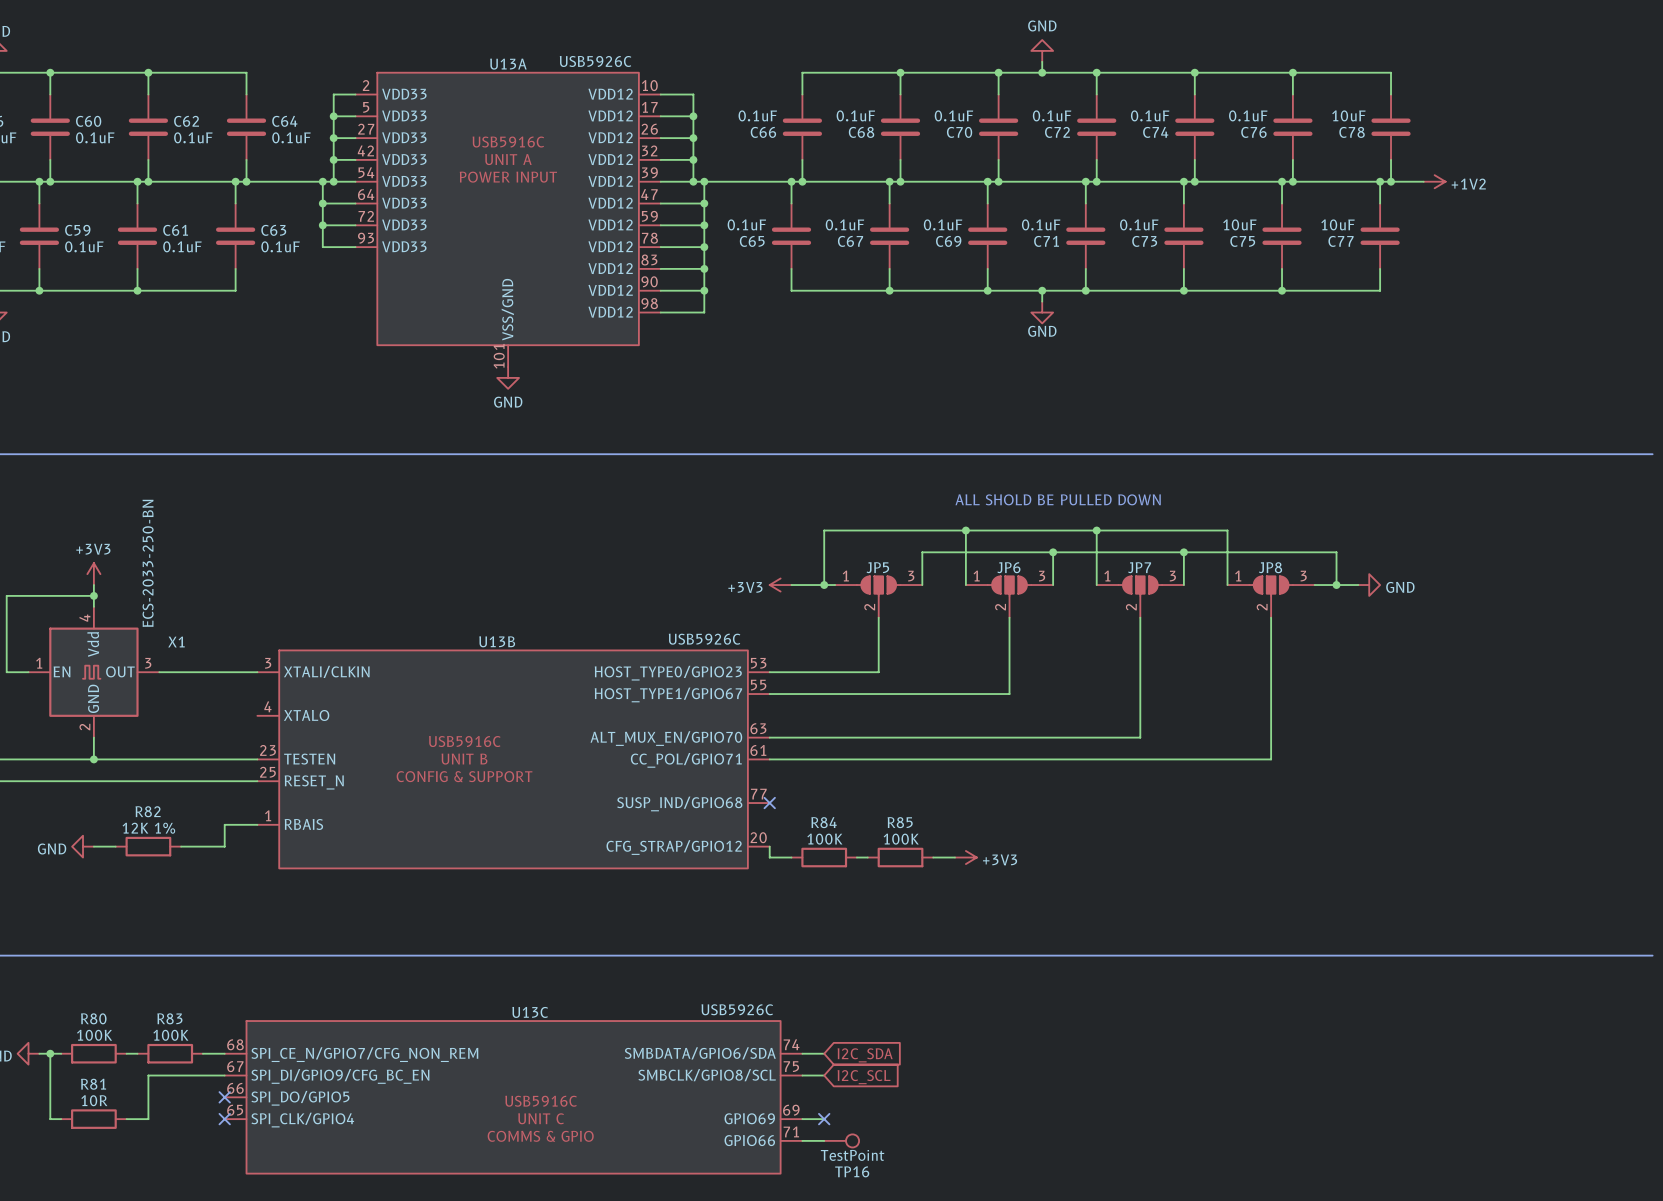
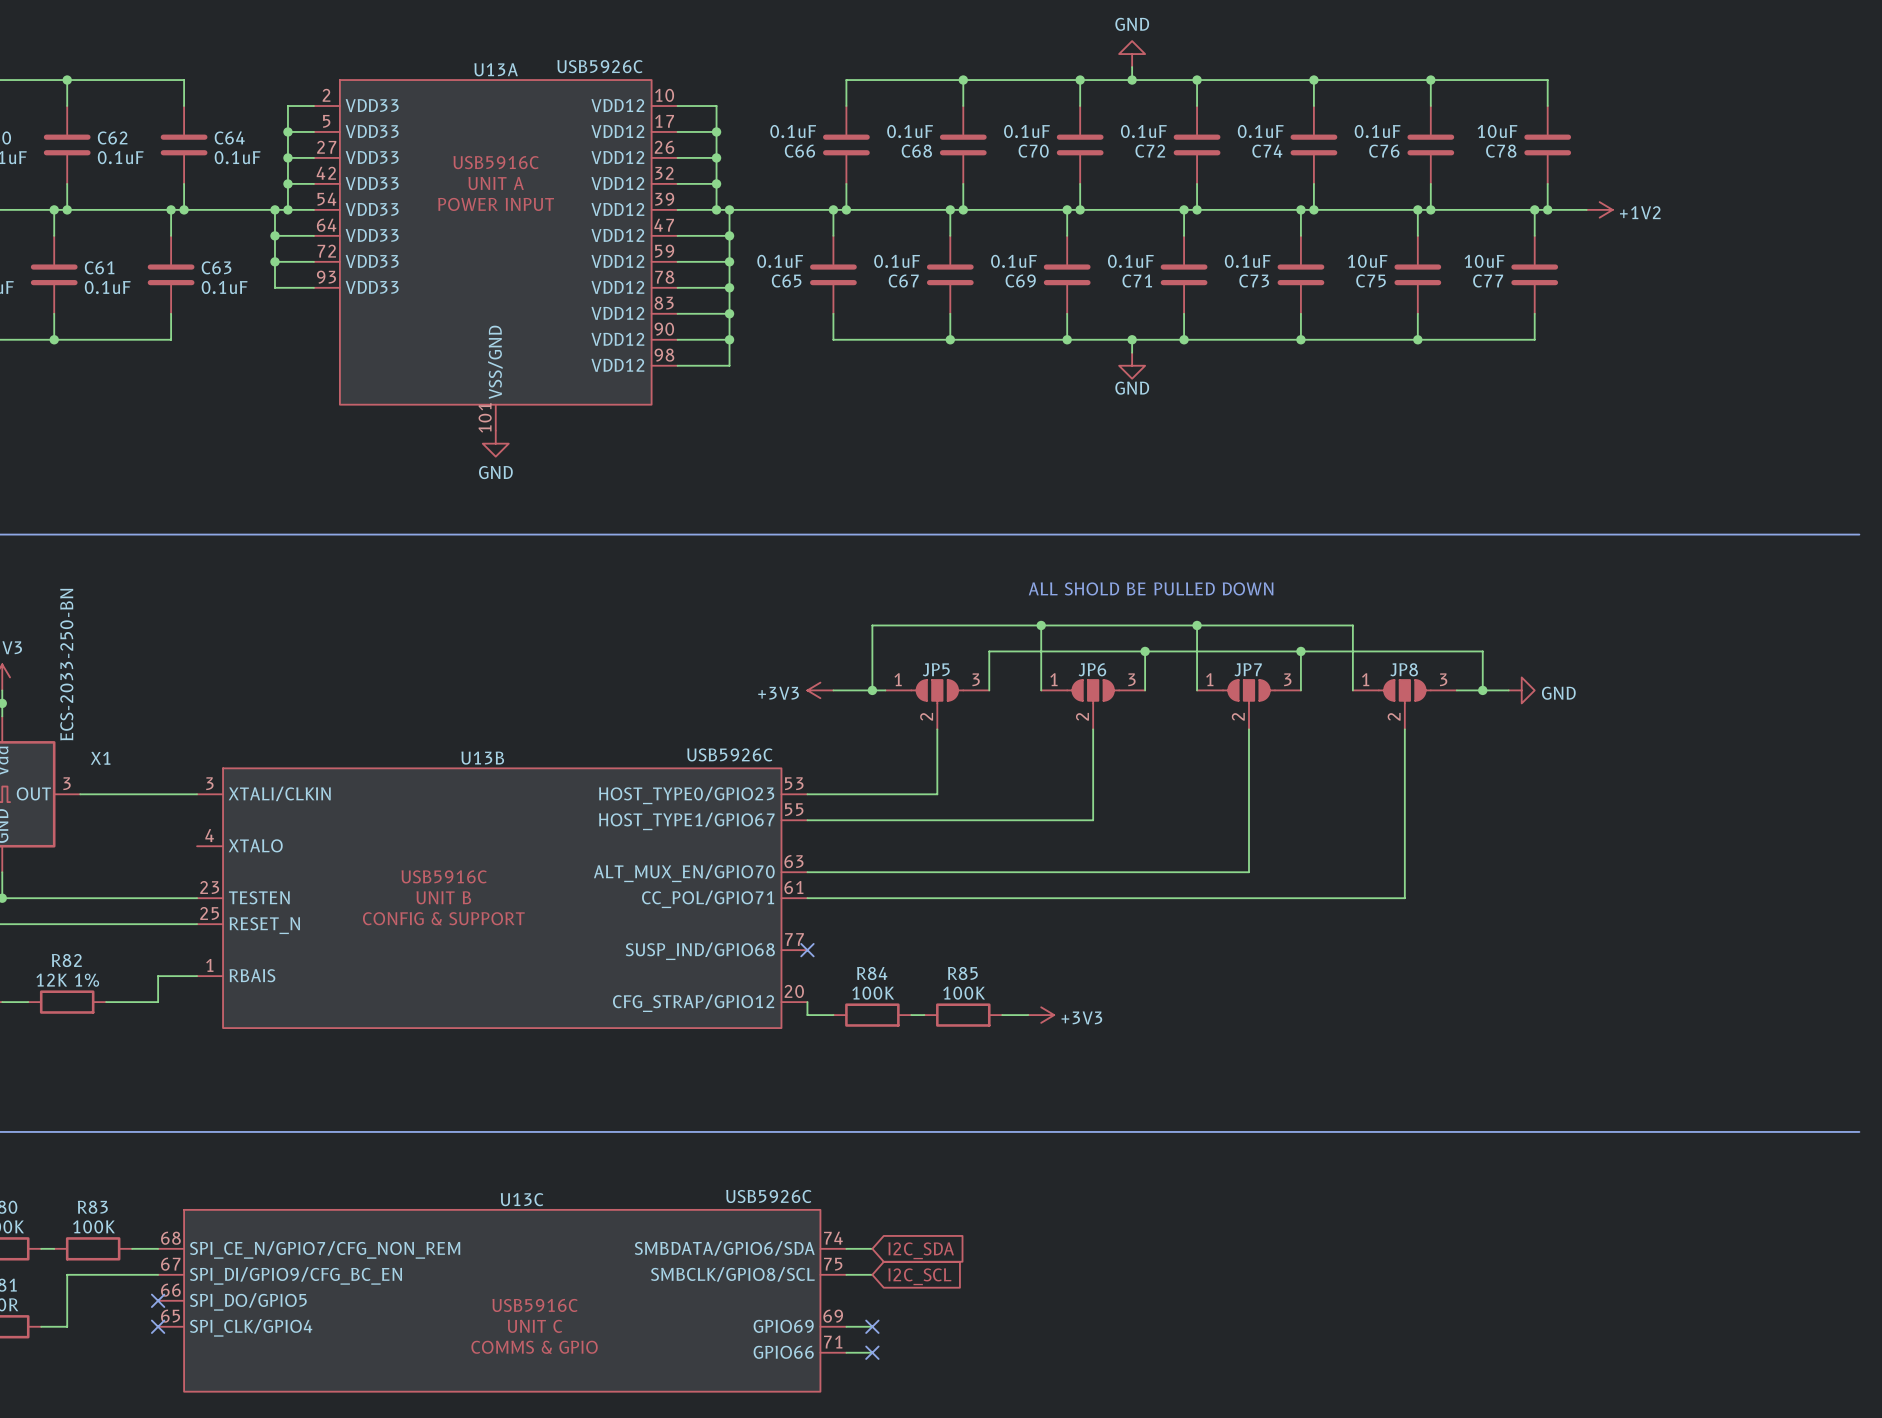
no-connect mark: none -> (872, 1352)
TP16: TestPoint (841, 1140) -> none

